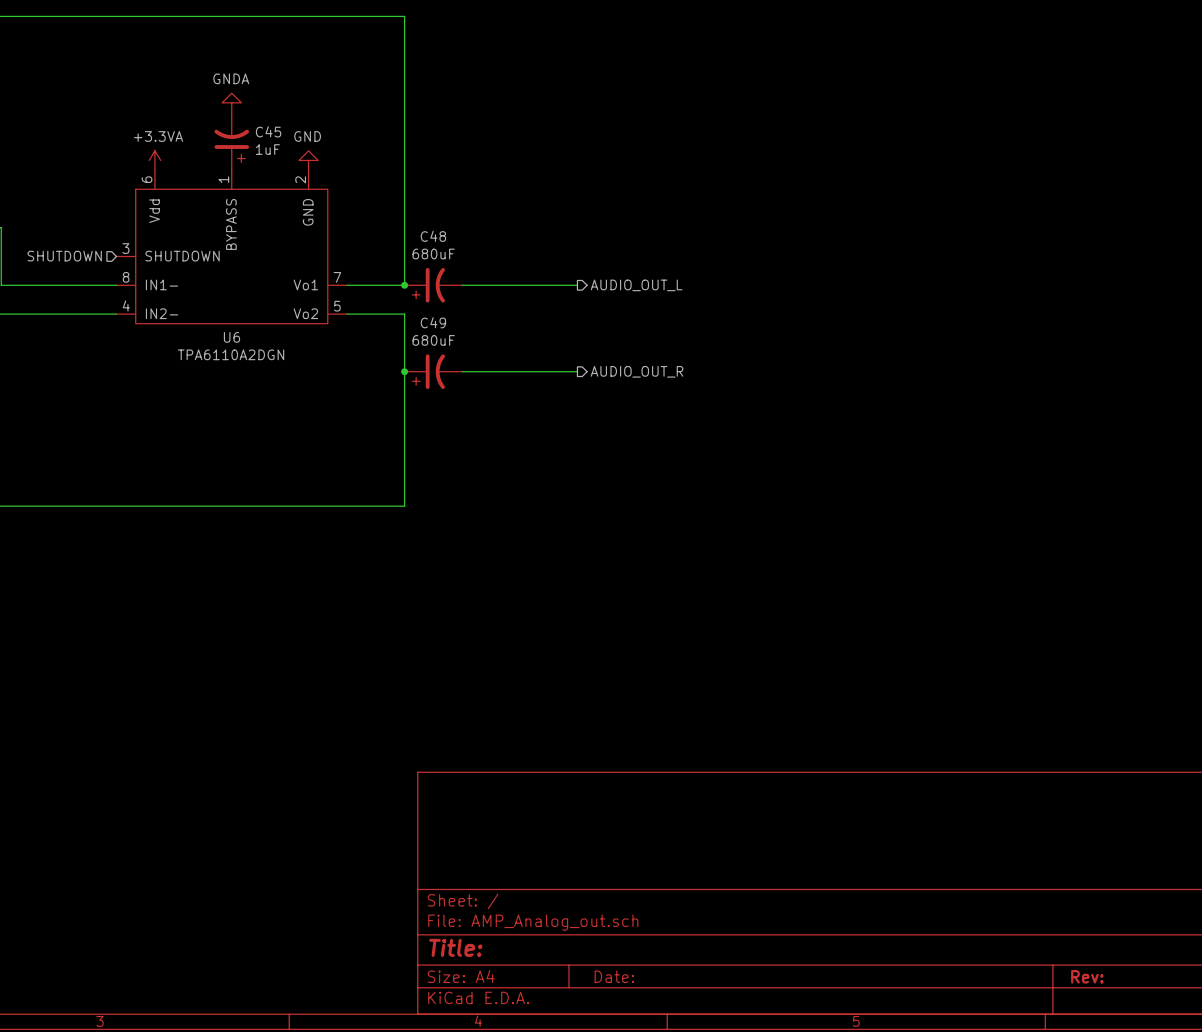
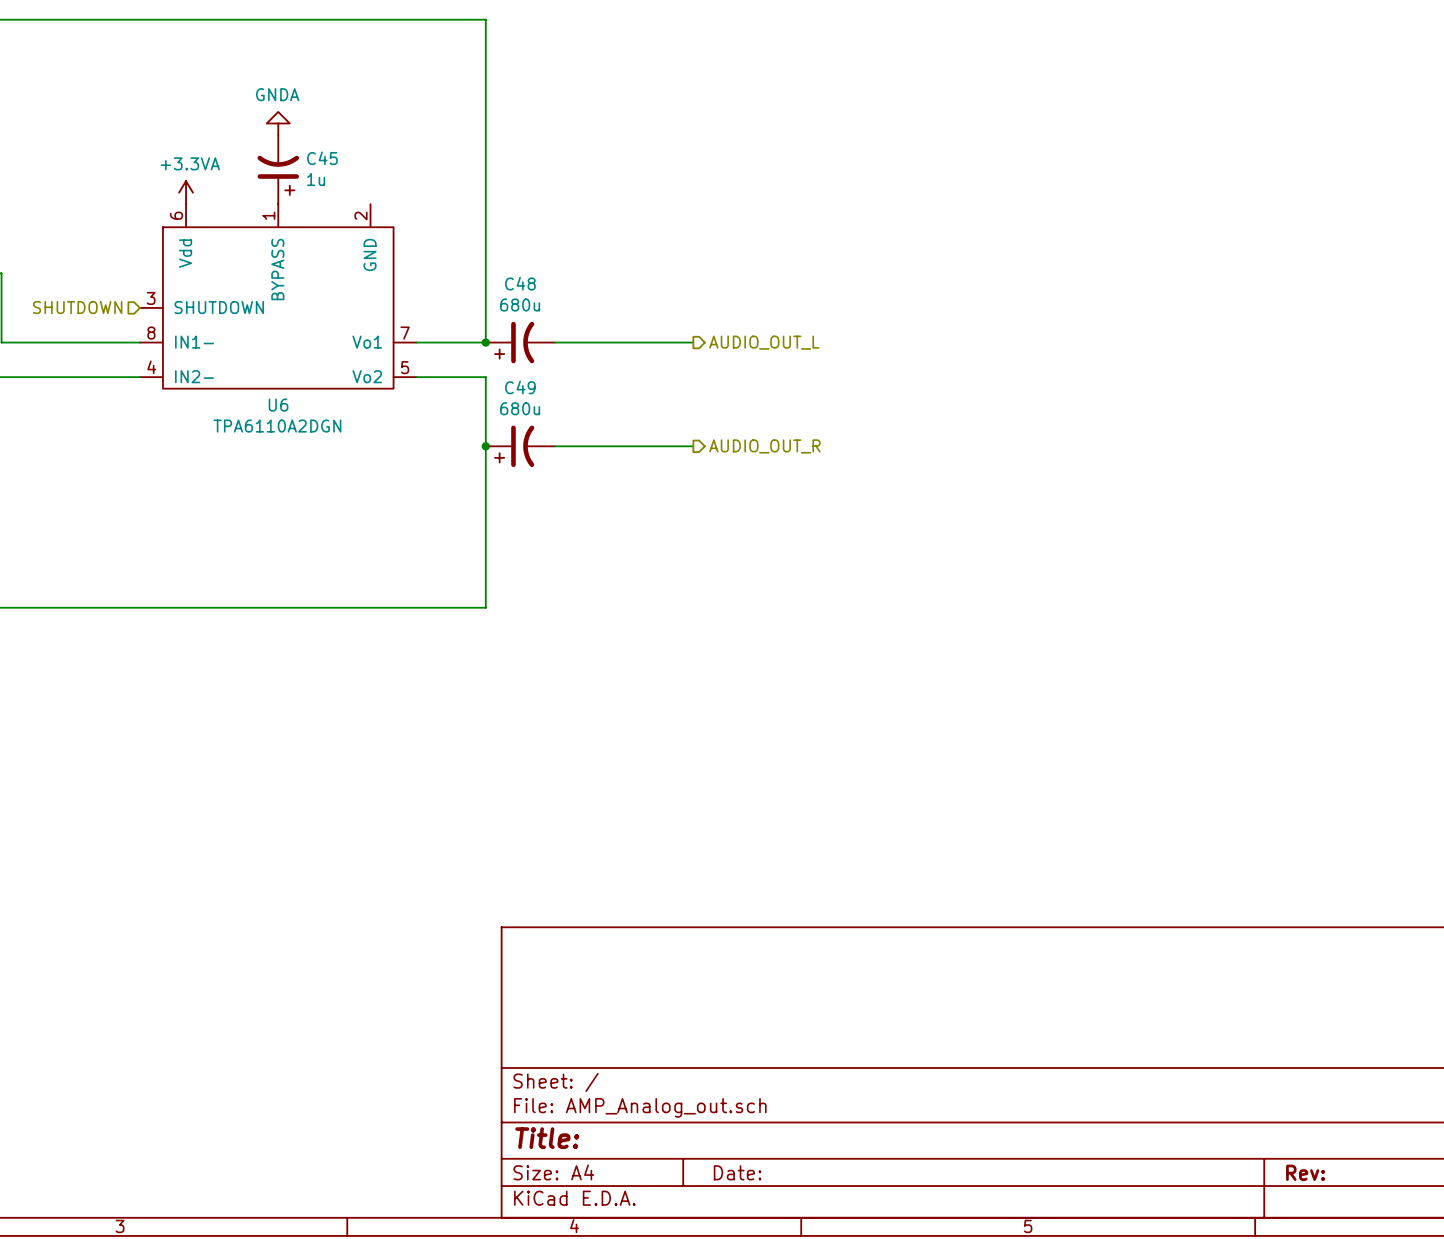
C45 value: 1uF (267, 149) -> 1u (316, 179)
power symbol: GND (308, 160) -> none
C48 value: 680uF (433, 254) -> 680u (520, 304)
C49 value: 680uF (433, 340) -> 680u (520, 408)

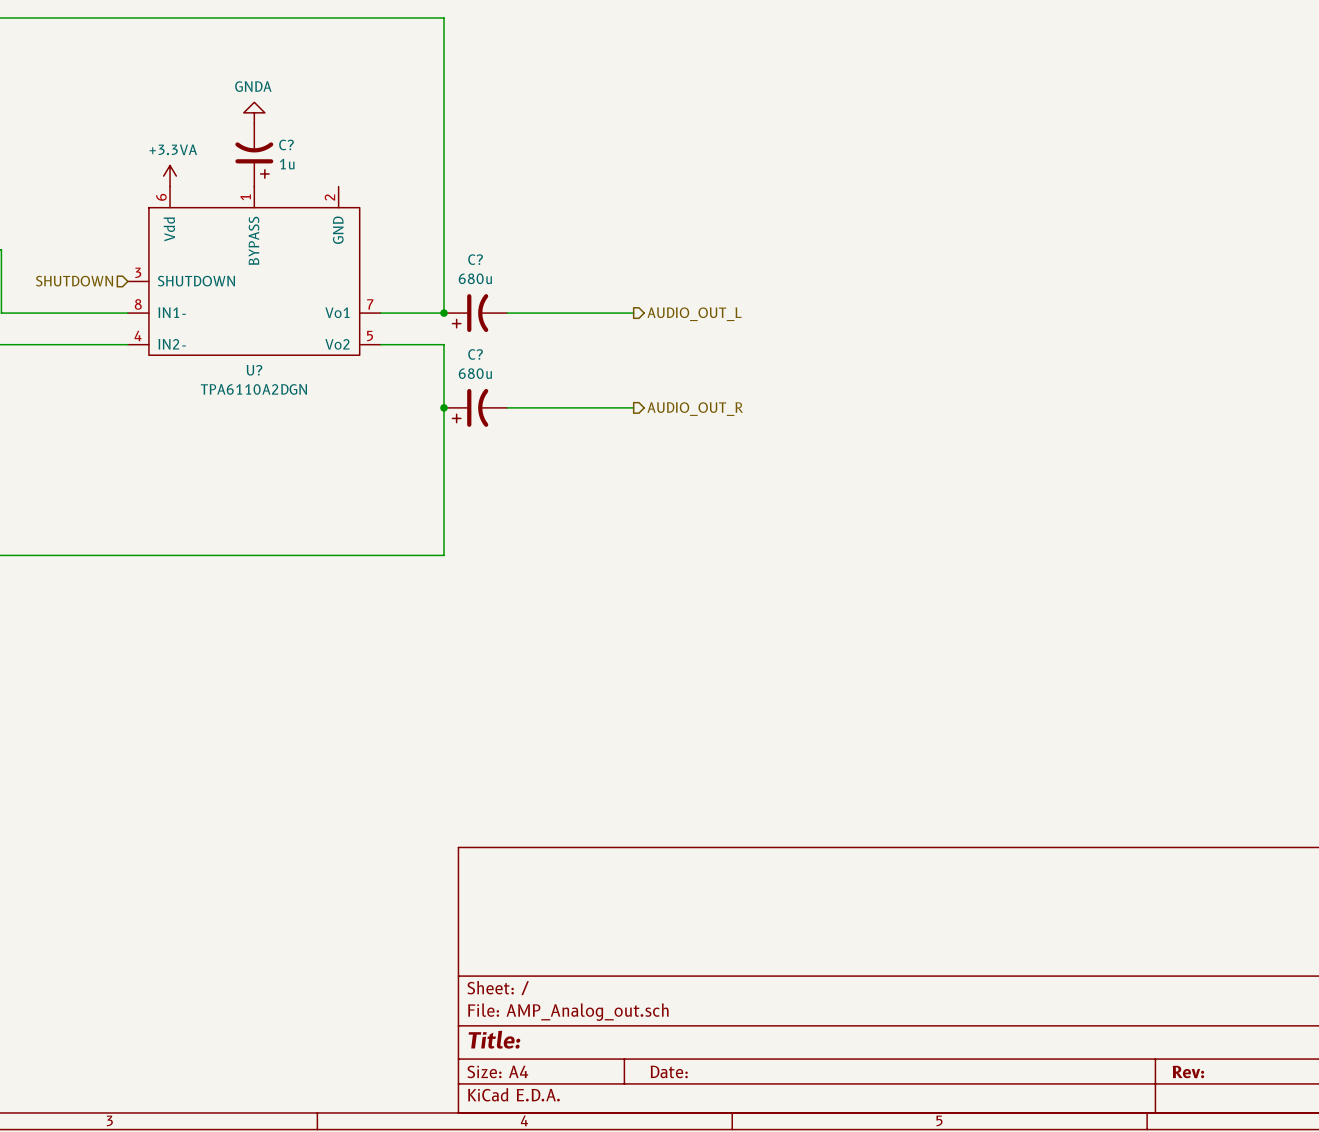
C45 name: C45 (322, 158) -> C? (286, 144)
C48 name: C48 (520, 283) -> C? (475, 259)
C49 name: C49 (520, 387) -> C? (475, 354)
U6 name: U6 (278, 405) -> U? (254, 370)

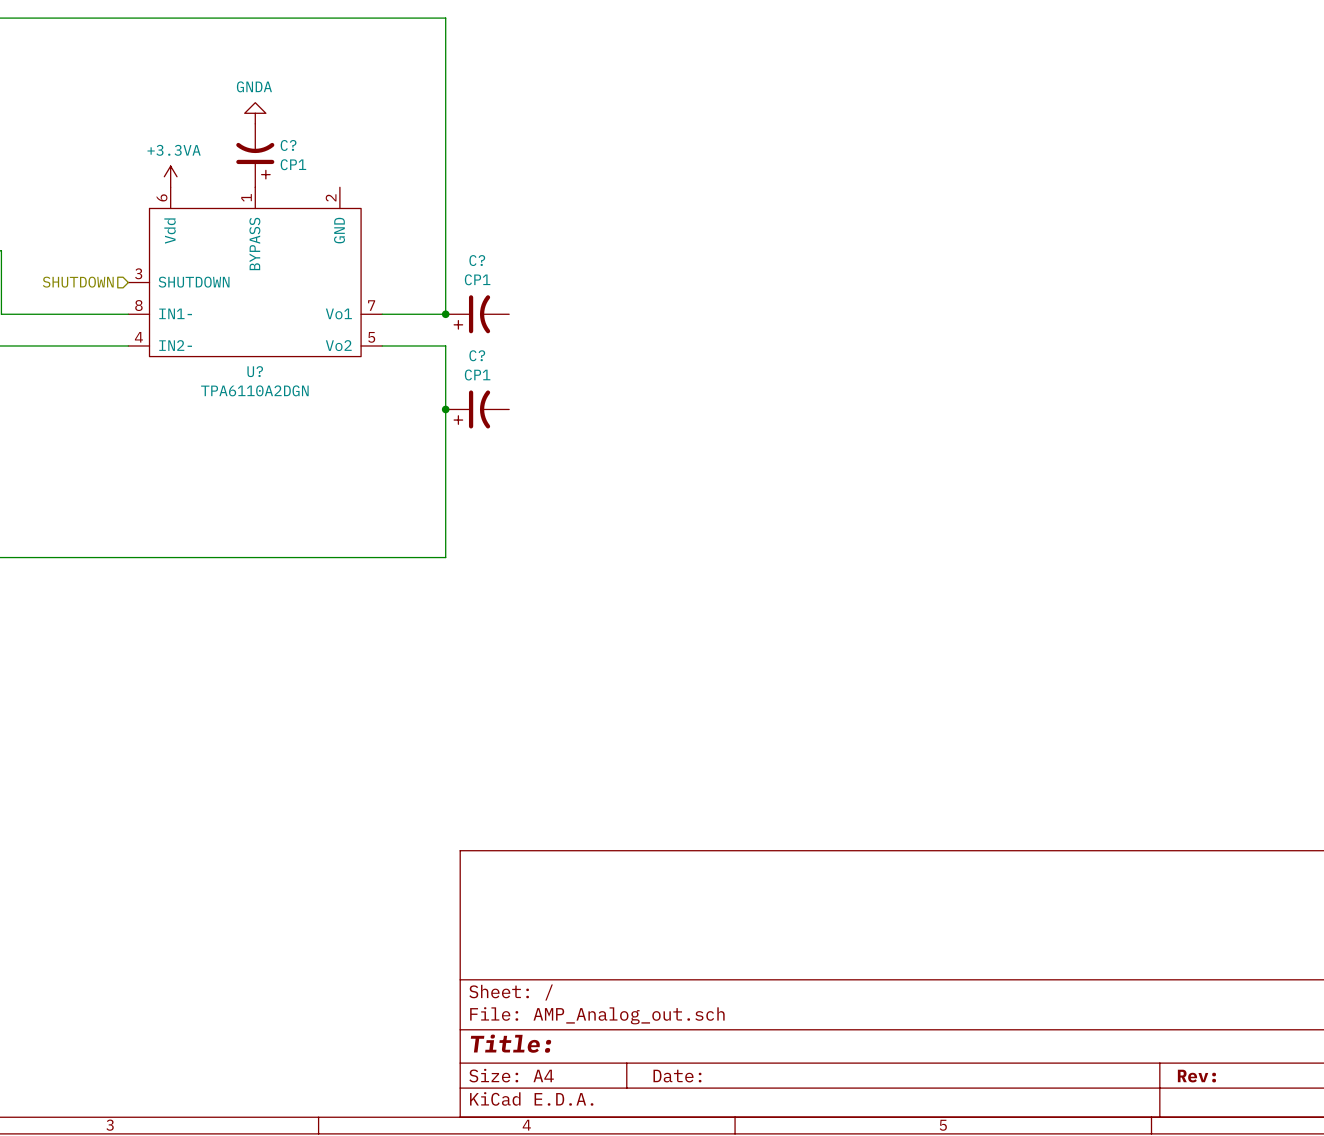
C? value: 1u (287, 164) -> CP1 (293, 164)
C? value: 680u (475, 278) -> CP1 (477, 279)
wire: (507, 313) (633, 313) -> none
hierarchical label: AUDIO_OUT_L (694, 314) -> none
C? value: 680u (475, 373) -> CP1 (477, 375)
wire: (507, 407) (633, 407) -> none
hierarchical label: AUDIO_OUT_R (695, 409) -> none

